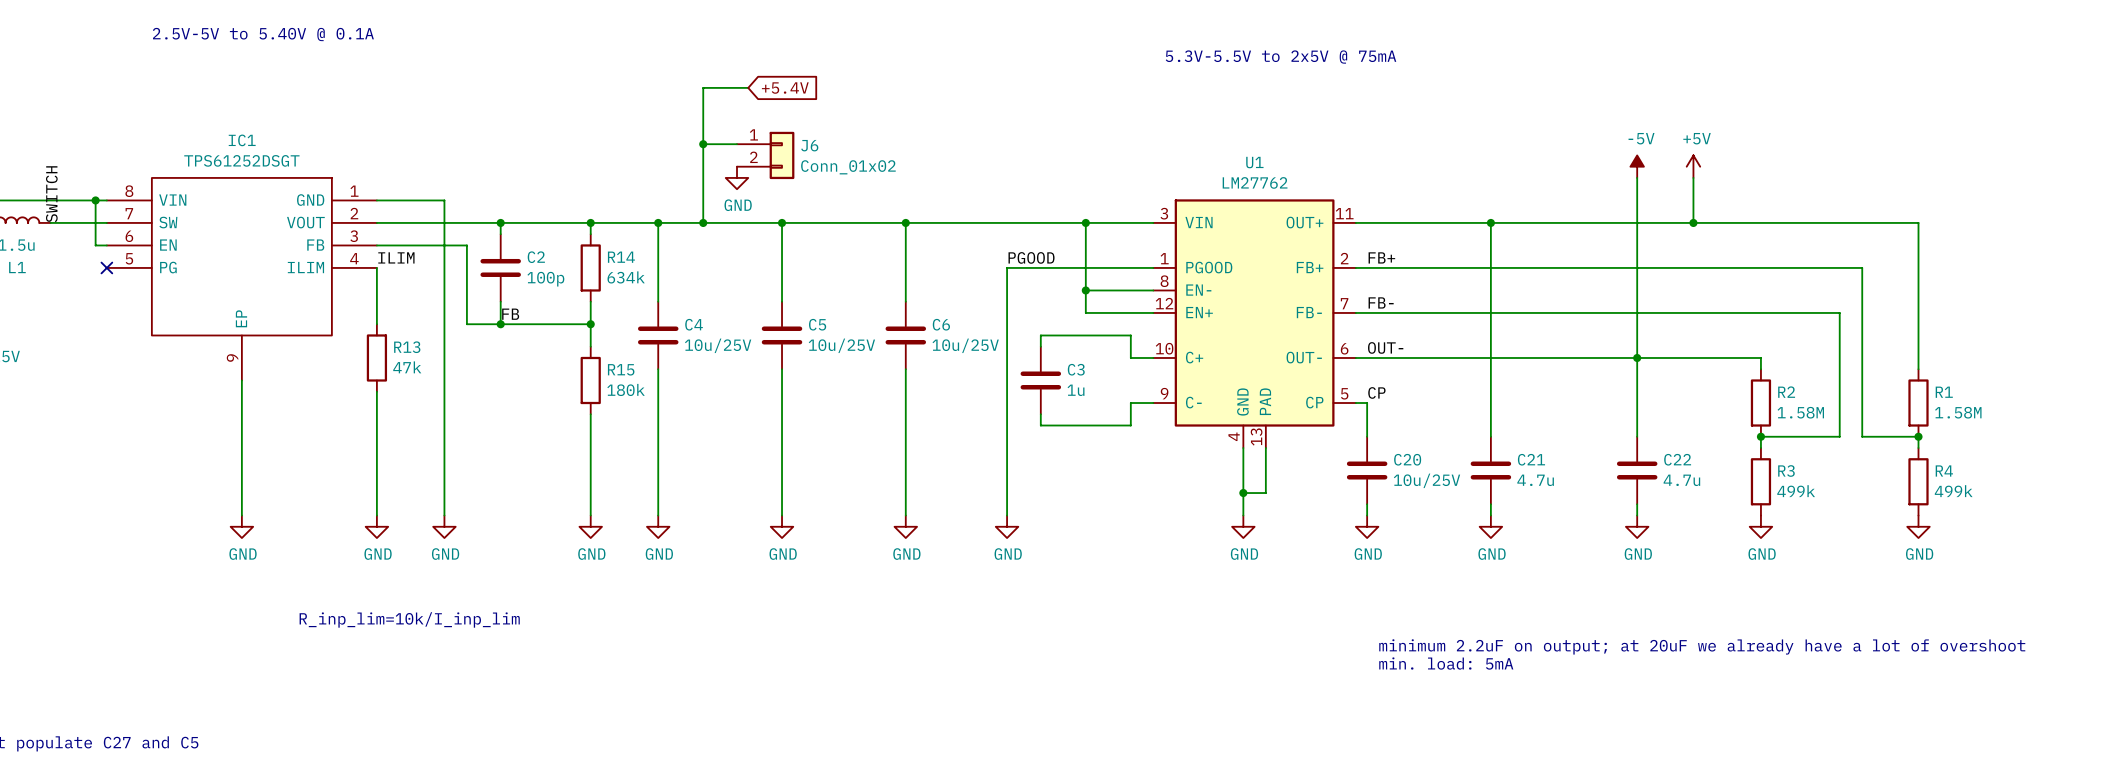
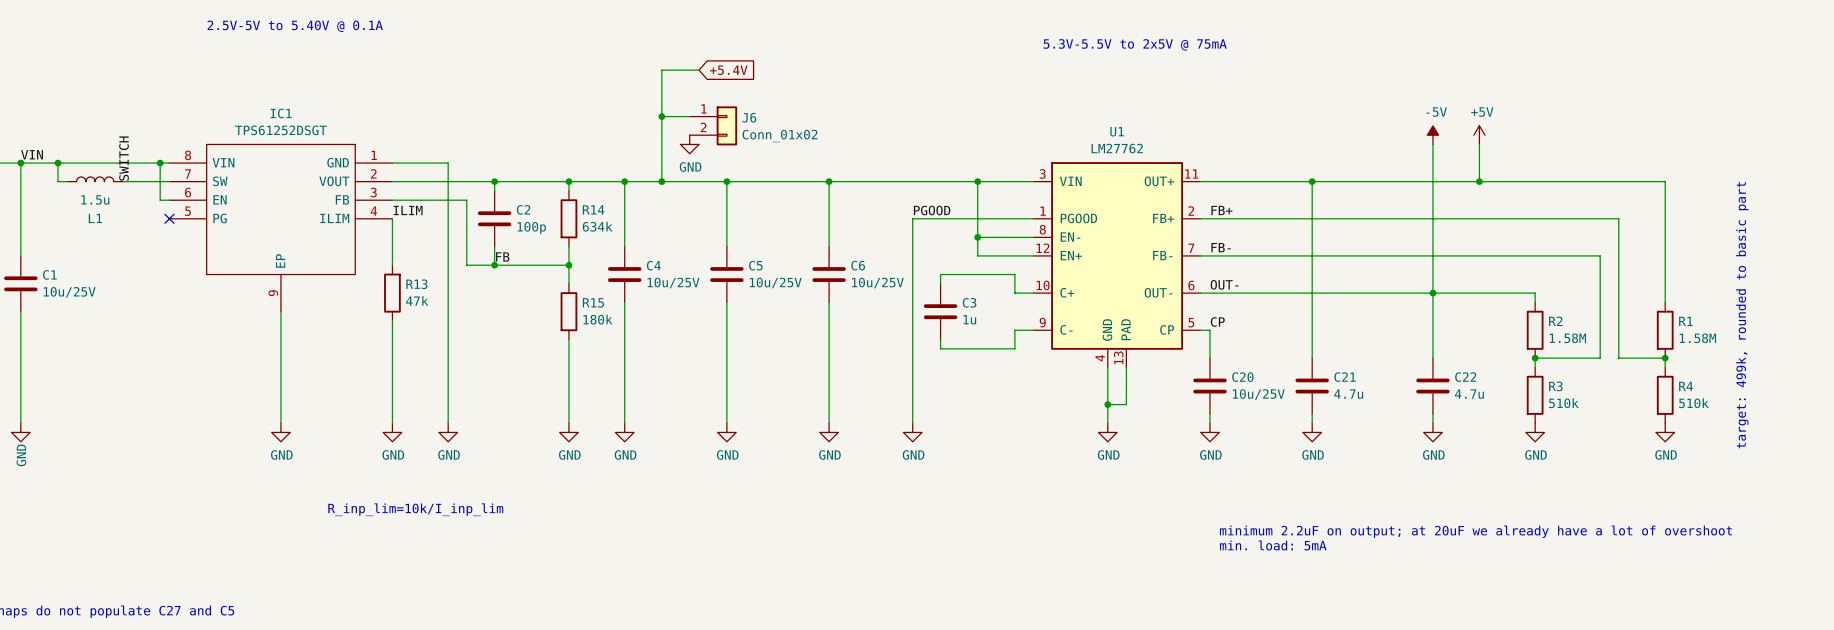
text: none -> target: 499k, rounded to basic part (1742, 315)
R3 value: 499k (1796, 491) -> 510k (1563, 403)
R4 value: 499k (1953, 491) -> 510k (1693, 403)

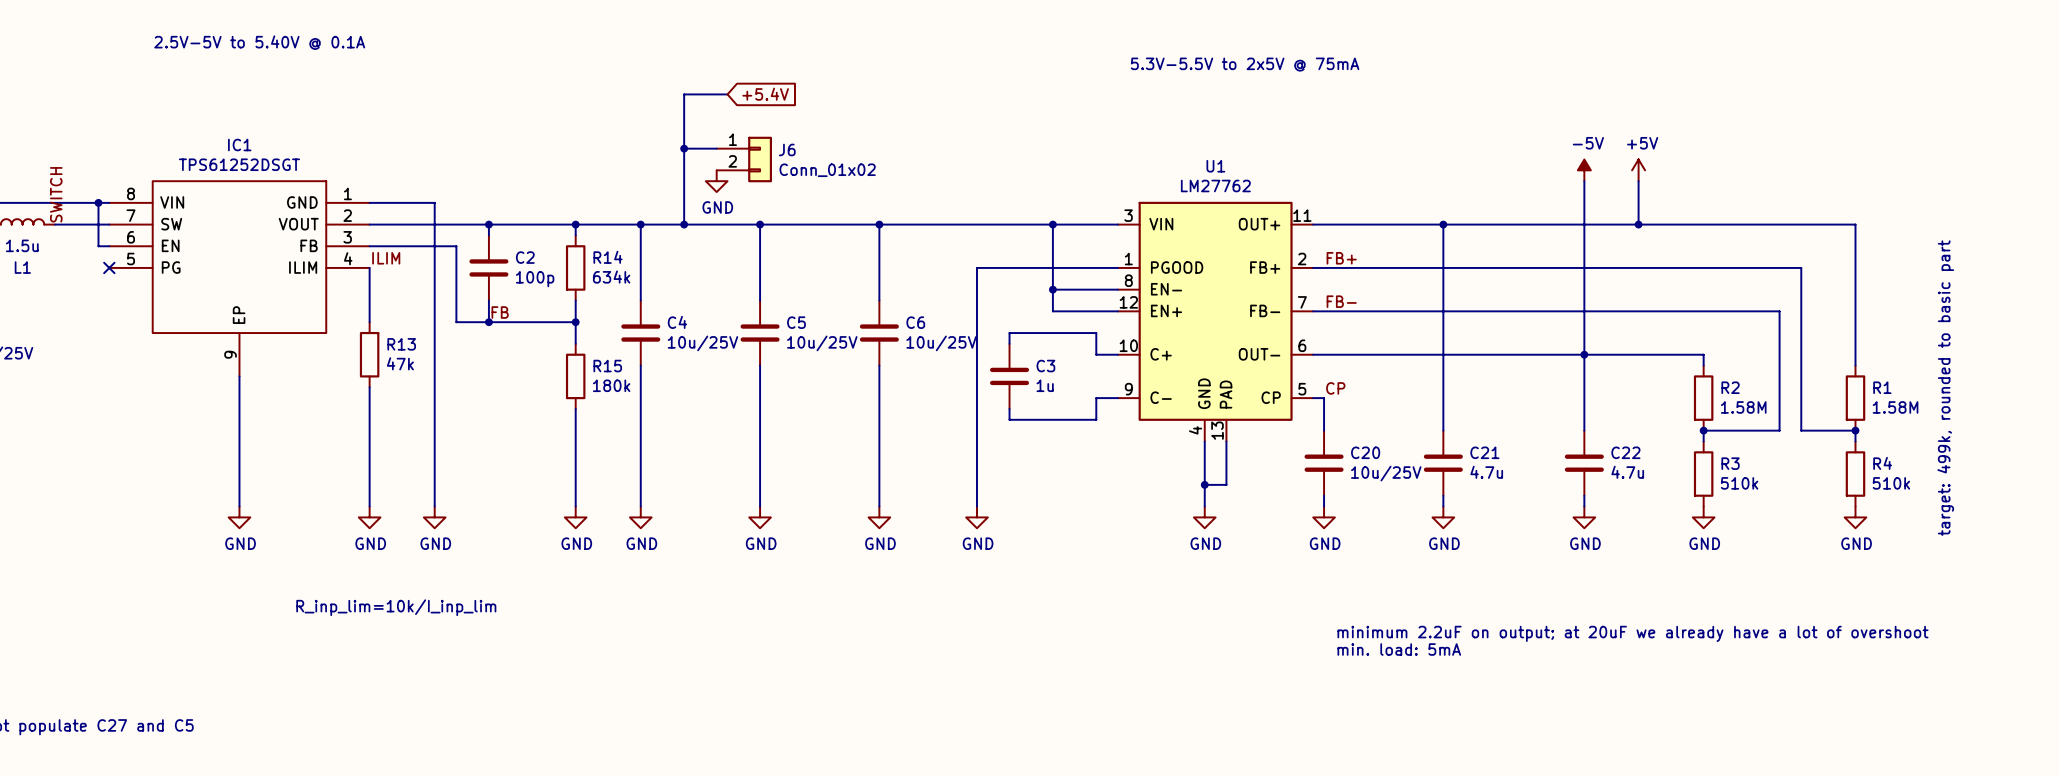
label: PGOOD (932, 210) -> none
label: OUT- (1224, 284) -> none

